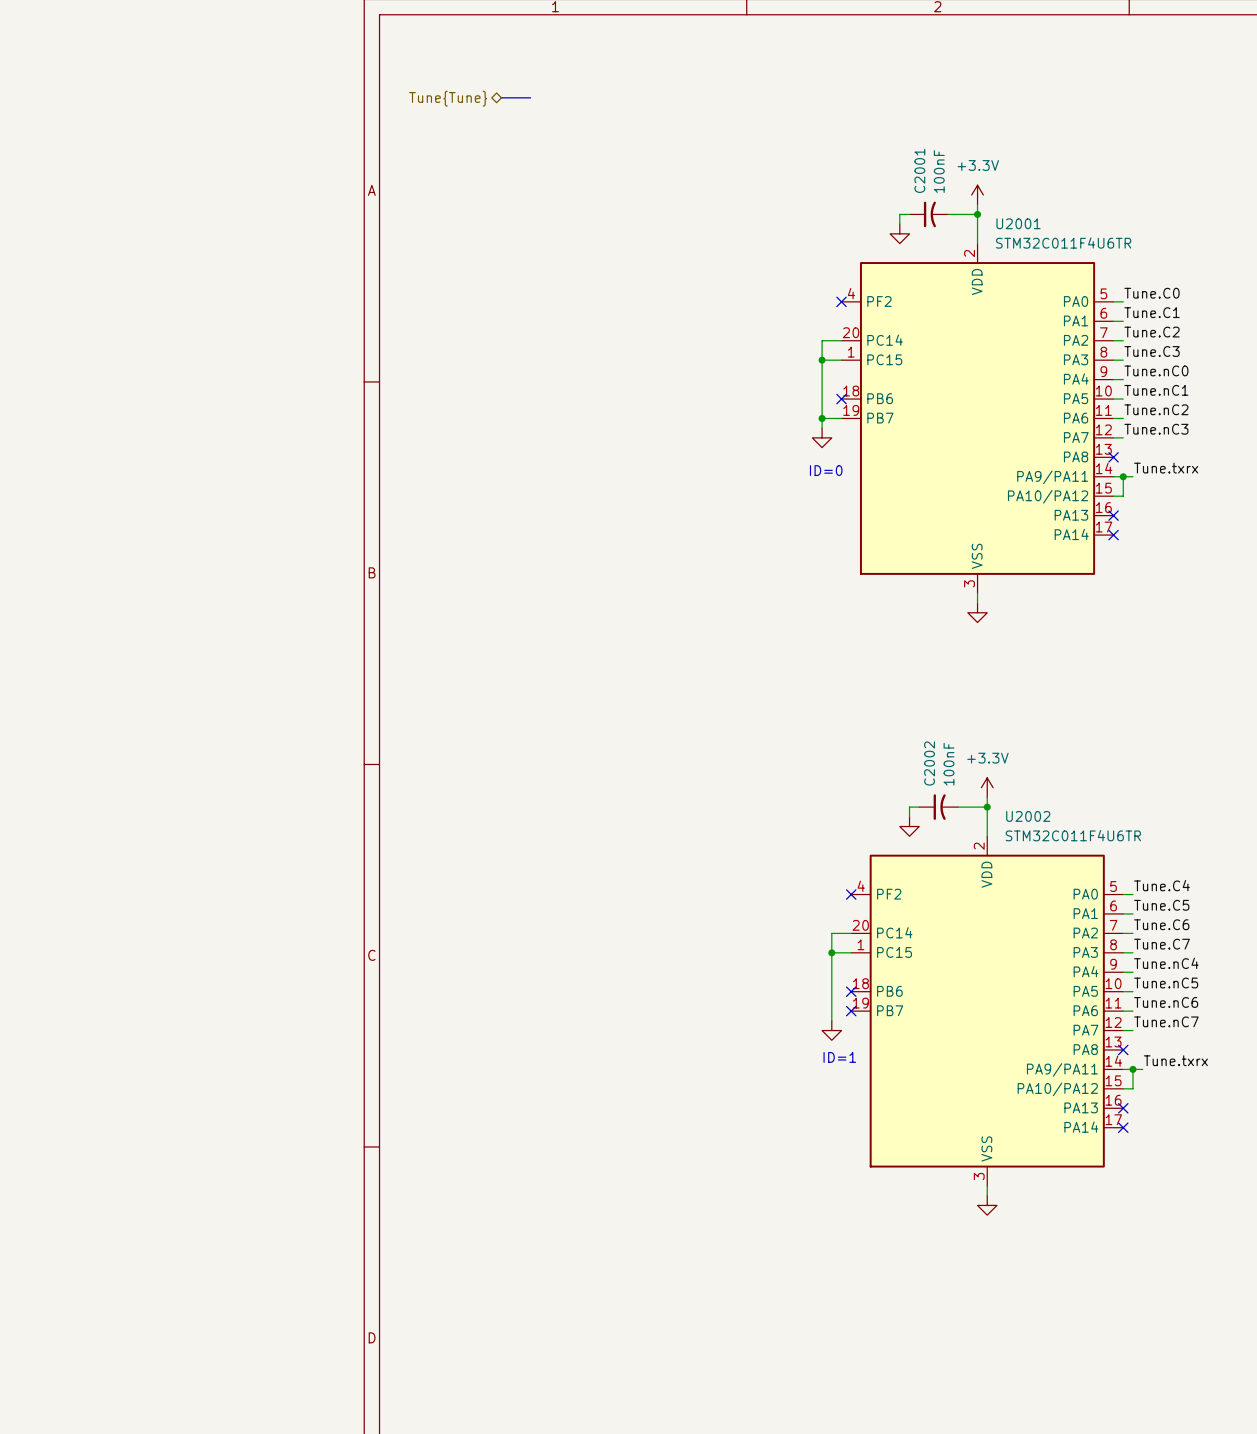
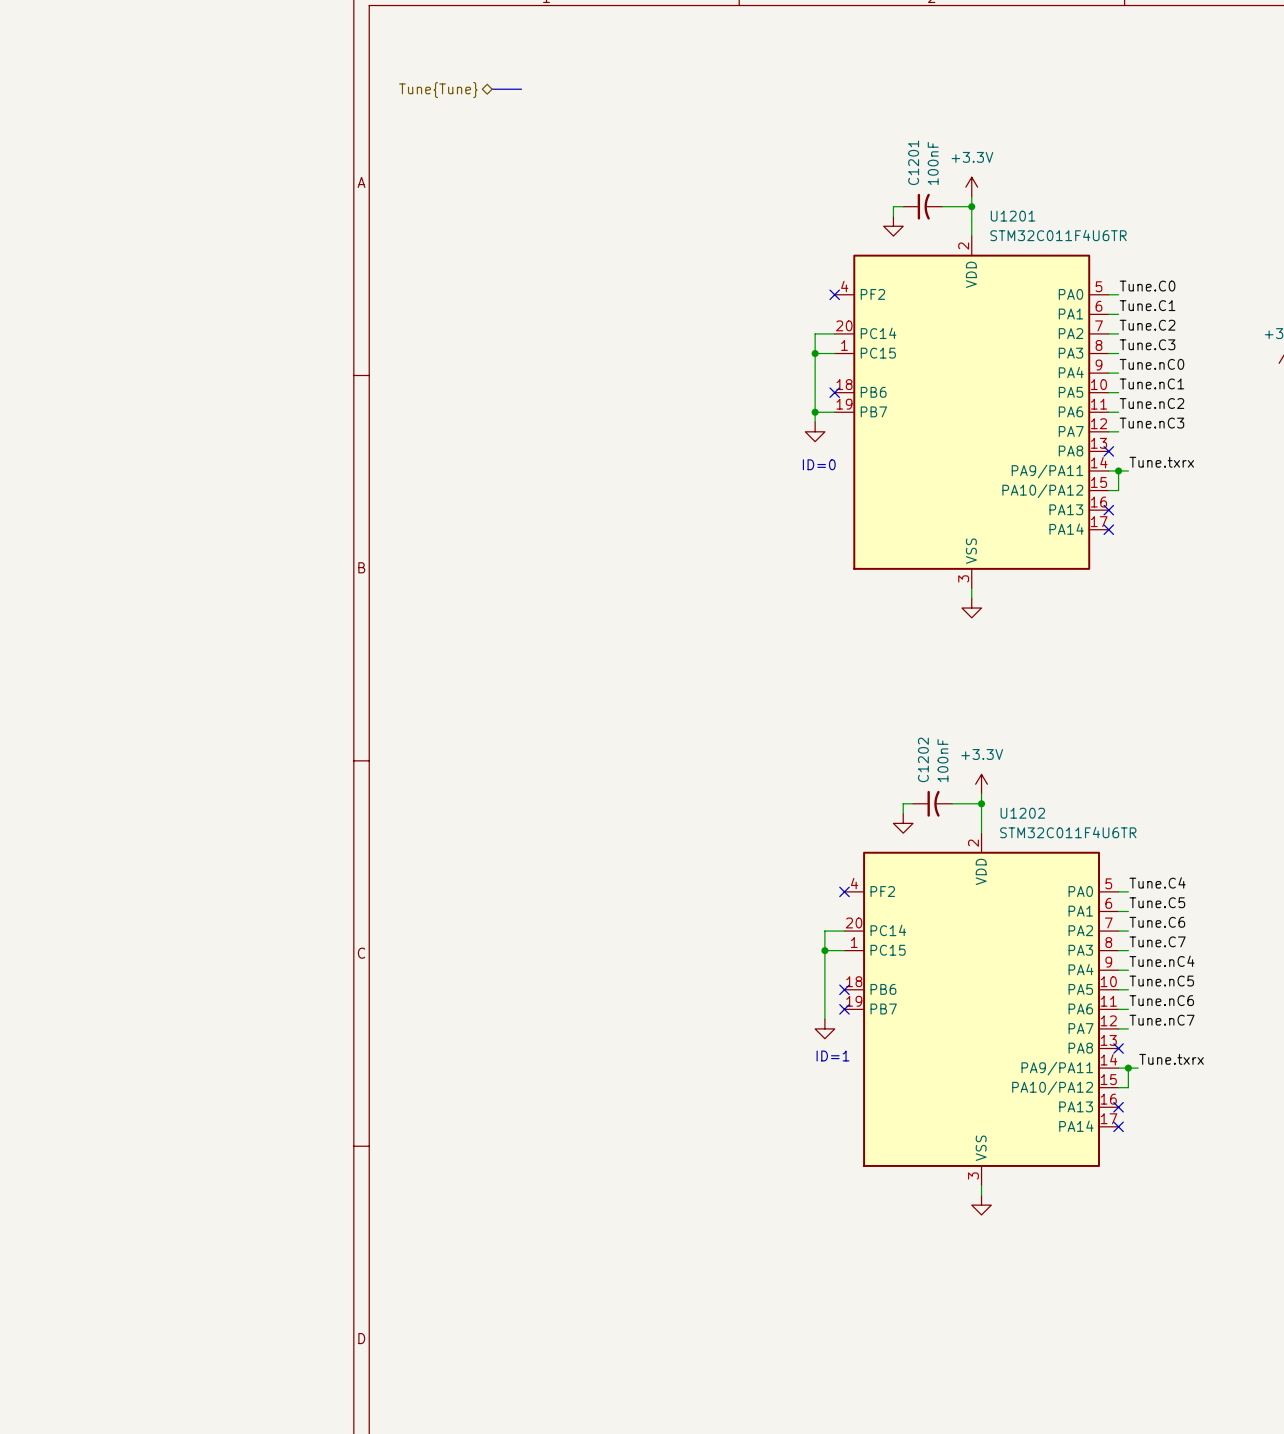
C2001 name: C2001 (919, 170) -> C1201 (913, 162)
U2001 name: U2001 (1018, 223) -> U1201 (1013, 216)
C2002 name: C2002 (929, 763) -> C1202 (923, 759)
U2002 name: U2002 (1028, 816) -> U1202 (1022, 813)

